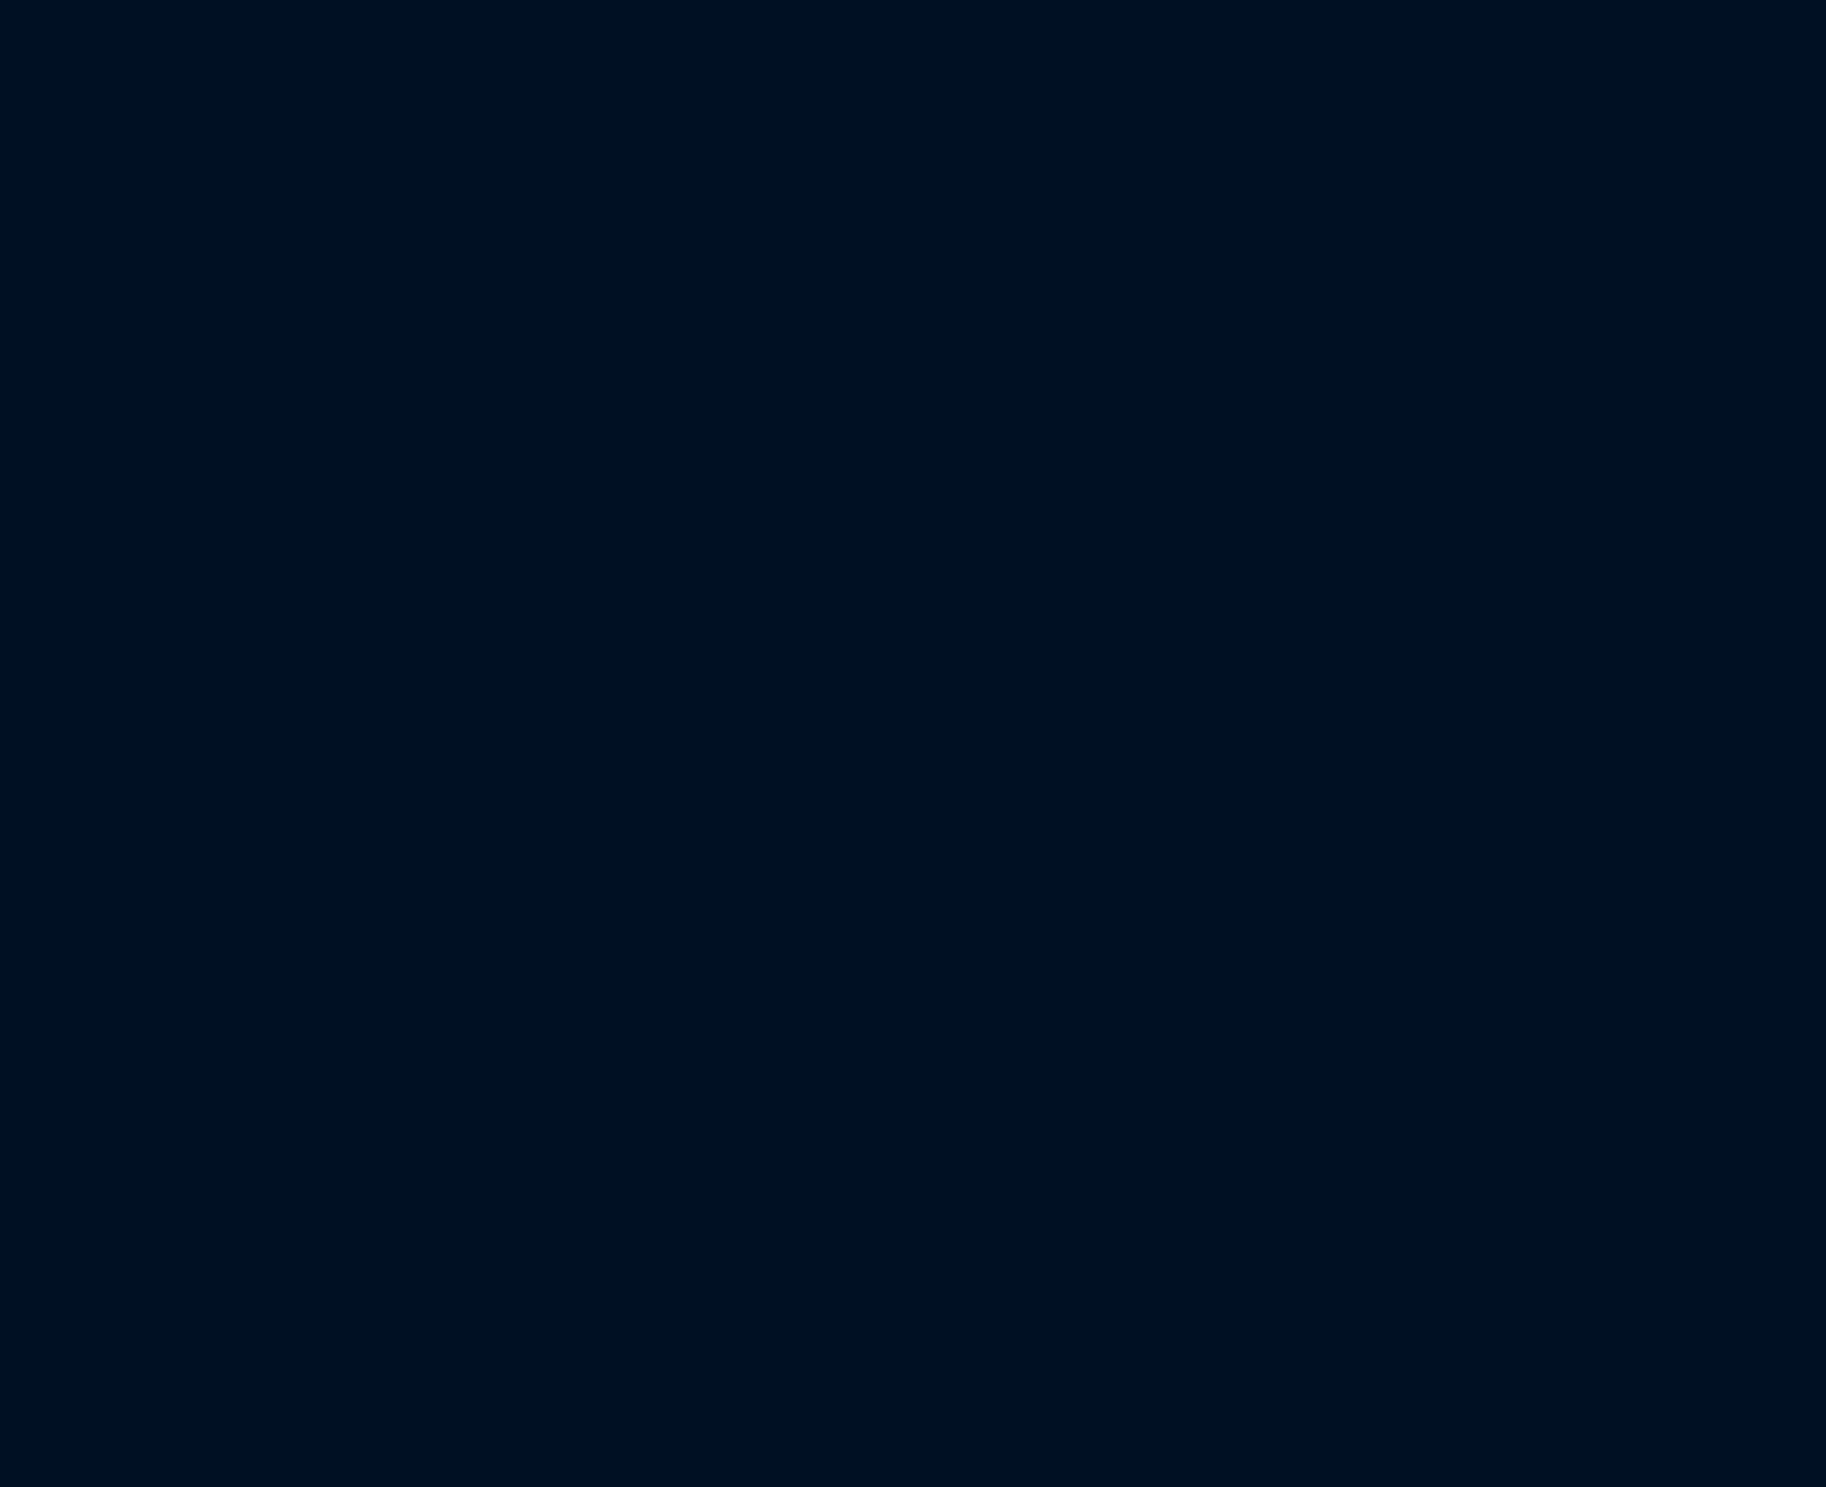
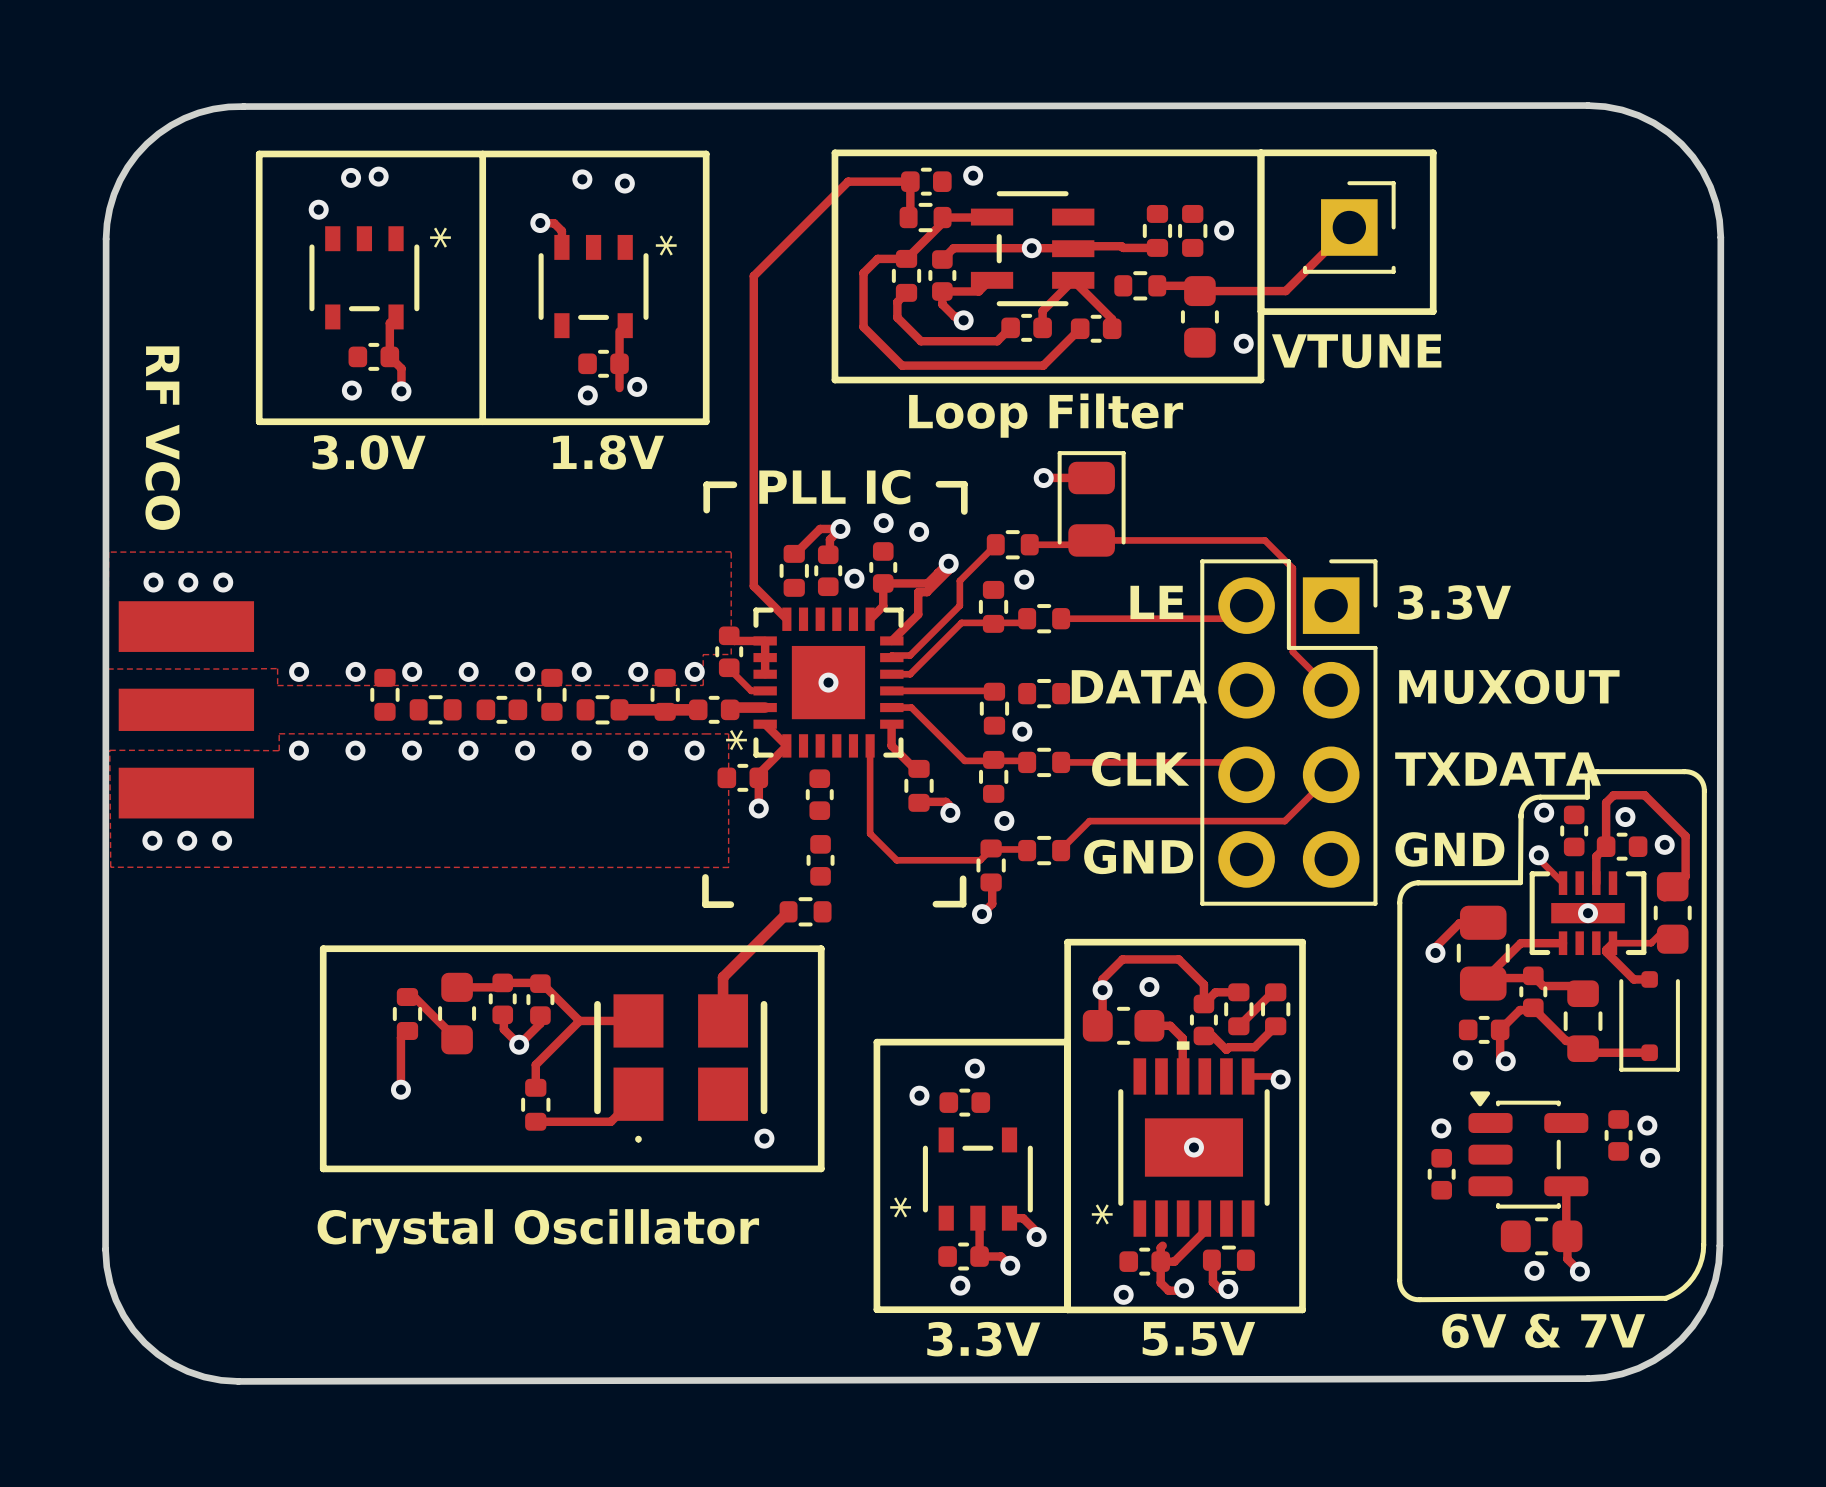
board edge: none -> (1587, 105) (243, 106) (228, 106) (198, 112) (184, 118) (158, 133) (136, 154) (120, 180) (109, 208) (106, 239) (105, 1249) (110, 1283) (115, 1300) (133, 1329) (157, 1354) (187, 1371) (221, 1380) (238, 1381) (1587, 1378) (1622, 1373) (1638, 1368) (1668, 1350) (1692, 1326) (1702, 1311) (1715, 1280) (1719, 1245) (1720, 237) (1716, 203) (1710, 186) (1702, 171) (1681, 144) (1654, 123) (1638, 115) (1622, 109) (1587, 105)
line: none -> (1260, 152) (1260, 380) (834, 380) (834, 152) (1433, 152) (1433, 311) (1260, 311)
line: none -> (259, 153) (706, 153) (706, 421) (259, 421) (259, 153)
line: none -> (482, 153) (482, 421)
via: none -> (973, 175)
via: none -> (378, 176)
via: none -> (351, 177)
via: none -> (582, 179)
part: none -> (926, 181)
via: none -> (624, 183)
via: none -> (318, 209)
track: none -> (908, 217) (910, 215) (910, 181) (848, 181) (753, 276) (753, 586) (786, 619)
part: none -> (925, 217)
track: none -> (989, 217) (942, 217) (942, 222) (906, 258) (877, 258) (863, 273) (863, 327) (902, 365) (1043, 365) (1080, 328)
track: none -> (540, 223) (554, 223) (561, 231) (561, 247)
via: none -> (540, 223)
track: none -> (1349, 227) (1285, 291) (1199, 291) (1194, 285) (1157, 285)
part: none -> (1349, 227)
part: none -> (1157, 230)
part: none -> (1192, 230)
via: none -> (1224, 230)
track: none -> (1157, 247) (1075, 246) (1073, 248) (953, 248) (942, 259)
via: none -> (1031, 248)
part: none -> (1032, 248)
part: none -> (906, 275)
part: none -> (942, 275)
part: none -> (364, 277)
track: none -> (989, 280) (978, 291) (942, 291) (942, 304) (954, 316) (959, 316) (963, 320)
part: none -> (1140, 285)
part: none -> (593, 286)
track: none -> (906, 292) (897, 302) (897, 317) (921, 341) (997, 341) (1010, 327)
track: none -> (396, 316) (389, 323) (389, 356) (401, 368) (401, 391)
part: none -> (1199, 316)
via: none -> (963, 320)
part: none -> (1026, 327)
track: none -> (1042, 327) (1042, 310) (1073, 280) (1112, 319) (1112, 328)
part: none -> (1096, 328)
track: none -> (619, 331) (619, 388)
via: none -> (1243, 343)
text: none -> VTUNE (1356, 351)
part: none -> (373, 356)
part: none -> (603, 363)
via: none -> (637, 386)
via: none -> (351, 390)
via: none -> (401, 391)
via: none -> (587, 395)
text: none -> Loop Filter (1046, 415)
text: none -> RF VCO (162, 438)
text: none -> 3.0V (369, 452)
text: none -> 1.8V (608, 452)
via: none -> (1043, 478)
line: none -> (733, 484) (706, 484) (706, 510)
line: none -> (938, 484) (964, 484) (964, 511)
text: none -> PLL IC (834, 487)
part: none -> (1091, 503)
via: none -> (883, 523)
via: none -> (840, 528)
via: none -> (919, 531)
track: none -> (996, 544) (959, 580) (959, 605) (910, 655) (891, 655) (891, 657)
part: none -> (1012, 544)
track: none -> (1028, 544) (1087, 544) (1091, 540) (1264, 540) (1292, 568) (1292, 651) (1331, 690)
zone outline: none -> (108, 552) (731, 551) (731, 654) (703, 654) (703, 685) (277, 685) (277, 668) (107, 669) (108, 552)
track: none -> (828, 554) (829, 539) (840, 528) (820, 528) (794, 554)
via: none -> (948, 563)
part: none -> (883, 567)
part: none -> (794, 570)
part: none -> (828, 570)
via: none -> (854, 578)
via: none -> (1024, 579)
via: none -> (153, 582)
via: none -> (188, 582)
via: none -> (223, 582)
text: none -> LE (1156, 602)
text: none -> 3.3V (1454, 602)
track: none -> (1246, 605) (1233, 618) (1060, 618)
part: none -> (993, 606)
track: none -> (1028, 618) (1023, 622) (961, 622) (910, 674) (891, 674)
part: none -> (1044, 618)
track: none -> (870, 619) (883, 606) (883, 583) (927, 583) (948, 563) (948, 570) (927, 592) (918, 592) (918, 614) (891, 640)
track: none -> (729, 635) (734, 640) (765, 640) (765, 674)
part: none -> (729, 651)
track: none -> (729, 667) (751, 690) (765, 690)
via: none -> (299, 671)
via: none -> (355, 671)
via: none -> (412, 671)
via: none -> (468, 671)
via: none -> (525, 671)
via: none -> (581, 671)
via: none -> (638, 671)
via: none -> (694, 671)
part: none -> (828, 682)
via: none -> (828, 682)
text: none -> DATA (1139, 686)
text: none -> MUXOUT (1509, 686)
track: none -> (891, 690) (994, 692)
part: none -> (1044, 693)
part: none -> (384, 694)
part: none -> (551, 694)
part: none -> (665, 694)
track: none -> (730, 707) (765, 707)
track: none -> (891, 707) (911, 707) (964, 760) (1028, 762)
part: none -> (994, 708)
part: none -> (186, 709)
part: none -> (435, 709)
part: none -> (501, 709)
part: none -> (602, 709)
track: none -> (618, 709) (698, 709)
part: none -> (714, 709)
track: none -> (765, 724) (786, 745) (758, 773) (758, 808)
track: none -> (891, 724) (891, 745) (915, 769) (919, 769)
via: none -> (1022, 731)
part: none -> (1288, 732)
zone outline: none -> (279, 733) (279, 750) (109, 750) (110, 867) (728, 867) (728, 733) (279, 733)
track: none -> (870, 745) (870, 833) (896, 860) (980, 860) (991, 849) (1028, 850)
via: none -> (298, 750)
via: none -> (355, 750)
via: none -> (412, 750)
via: none -> (468, 750)
via: none -> (525, 750)
via: none -> (581, 750)
via: none -> (638, 750)
via: none -> (694, 750)
part: none -> (1044, 762)
track: none -> (1060, 762) (1234, 762) (1246, 774)
text: none -> CLK (1140, 769)
text: none -> TXDATA (1498, 769)
track: none -> (1331, 774) (1284, 821) (1089, 821) (1060, 850)
part: none -> (993, 776)
part: none -> (742, 777)
part: none -> (919, 785)
part: none -> (819, 794)
track: none -> (919, 801) (945, 801) (948, 804) (950, 812)
via: none -> (758, 808)
via: none -> (950, 812)
via: none -> (1544, 812)
line: none -> (1521, 814) (1520, 882) (1418, 882)
line: none -> (1521, 817) (1524, 804) (1533, 798) (1587, 797) (1587, 777) (1594, 771) (1688, 771) (1696, 775) (1703, 784) (1703, 1244) (1702, 1258) (1696, 1271) (1688, 1283) (1678, 1292) (1665, 1298) (1417, 1299) (1409, 1297) (1402, 1290) (1399, 1280) (1399, 900) (1404, 888) (1410, 884) (1418, 882)
via: none -> (1625, 817)
via: none -> (1004, 820)
part: none -> (1574, 830)
via: none -> (152, 840)
via: none -> (187, 840)
via: none -> (222, 840)
via: none -> (1664, 844)
part: none -> (1622, 846)
text: none -> GND (1449, 849)
part: none -> (1044, 850)
track: none -> (1538, 855) (1538, 858) (1563, 883)
via: none -> (1538, 855)
text: none -> GND (1138, 856)
part: none -> (820, 860)
part: none -> (991, 865)
line: none -> (705, 877) (705, 904) (730, 904)
line: none -> (963, 878) (963, 904) (935, 904)
track: none -> (991, 881) (992, 903) (982, 914)
track: none -> (1596, 883) (1596, 856) (1606, 846) (1606, 802) (1613, 795) (1644, 795) (1685, 836) (1685, 876) (1664, 897)
track: none -> (788, 911) (723, 977) (723, 1020)
part: none -> (805, 911)
part: none -> (1672, 912)
part: none -> (1588, 913)
via: none -> (1588, 913)
via: none -> (982, 914)
track: none -> (1485, 923) (1459, 923) (1435, 947) (1435, 952)
track: none -> (1664, 929) (1651, 943) (1612, 943) (1606, 949) (1633, 979) (1649, 979)
line: none -> (1067, 942) (1067, 1309) (1302, 1309) (1302, 942) (1067, 942)
track: none -> (1563, 943) (1520, 943) (1485, 978) (1485, 983) (1491, 978) (1535, 978) (1543, 986) (1577, 986)
line: none -> (323, 948) (821, 948) (821, 1168) (323, 1168) (323, 948)
via: none -> (1435, 952)
part: none -> (1483, 953)
track: none -> (457, 987) (498, 987) (502, 982) (539, 982) (579, 1020) (638, 1020)
via: none -> (1149, 987)
via: none -> (1102, 990)
part: none -> (1533, 991)
track: none -> (1238, 992) (1215, 992) (1203, 1003) (1203, 984) (1178, 959) (1122, 959) (1102, 979) (1102, 1020) (1097, 1025)
track: none -> (1275, 992) (1272, 992) (1238, 1026)
track: none -> (407, 997) (414, 997) (457, 1039)
part: none -> (502, 998)
part: none -> (540, 999)
part: none -> (1238, 1009)
part: none -> (1275, 1009)
part: none -> (457, 1013)
part: none -> (407, 1014)
track: none -> (502, 1014) (503, 1029) (519, 1044) (540, 1023) (540, 1015)
part: none -> (1203, 1019)
track: none -> (579, 1021) (535, 1064) (535, 1087)
part: none -> (1583, 1021)
part: none -> (1649, 1021)
part: none -> (1123, 1025)
track: none -> (1149, 1025) (1170, 1025) (1182, 1038) (1182, 1076)
track: none -> (1275, 1026) (1254, 1047) (1229, 1047) (1226, 1049) (1212, 1035) (1203, 1035)
part: none -> (1484, 1029)
track: none -> (407, 1030) (400, 1037) (400, 1089)
line: none -> (1067, 1042) (876, 1042) (876, 1309) (1067, 1309)
via: none -> (519, 1044)
track: none -> (1583, 1051) (1649, 1052)
track: none -> (1590, 1053) (1577, 1040) (1566, 1040) (1535, 1010) (1520, 1010) (1500, 1029) (1500, 1055) (1505, 1061)
via: none -> (1462, 1060)
via: none -> (1505, 1061)
part: none -> (680, 1068)
via: none -> (974, 1068)
track: none -> (1248, 1076) (1277, 1076) (1280, 1079)
via: none -> (1280, 1079)
via: none -> (400, 1089)
track: none -> (638, 1094) (610, 1121) (535, 1121)
via: none -> (919, 1095)
part: none -> (964, 1102)
part: none -> (535, 1104)
via: none -> (1647, 1125)
via: none -> (1441, 1128)
part: none -> (1618, 1135)
via: none -> (764, 1138)
part: none -> (1193, 1139)
via: none -> (1193, 1147)
part: none -> (1528, 1149)
via: none -> (1650, 1157)
part: none -> (1441, 1174)
part: none -> (977, 1179)
track: none -> (1566, 1186) (1567, 1259) (1579, 1271)
track: none -> (977, 1218) (979, 1219) (979, 1256) (1001, 1256) (1010, 1265)
track: none -> (1009, 1218) (1023, 1218) (1036, 1231) (1036, 1237)
track: none -> (1204, 1218) (1204, 1231) (1174, 1261) (1160, 1261)
text: none -> Crystal Oscillator (538, 1231)
part: none -> (1541, 1236)
via: none -> (1036, 1237)
track: none -> (1162, 1245) (1160, 1247) (1160, 1282) (1168, 1290) (1181, 1290) (1184, 1288)
part: none -> (963, 1256)
track: none -> (1212, 1260) (1212, 1282) (1219, 1289) (1228, 1289)
part: none -> (1228, 1260)
part: none -> (1144, 1261)
via: none -> (1010, 1265)
via: none -> (1534, 1270)
via: none -> (1579, 1271)
via: none -> (960, 1285)
via: none -> (1184, 1288)
via: none -> (1228, 1289)
via: none -> (1123, 1294)
text: none -> 6V & 7V (1543, 1330)
text: none -> 5.5V (1198, 1338)
text: none -> 3.3V (983, 1339)

